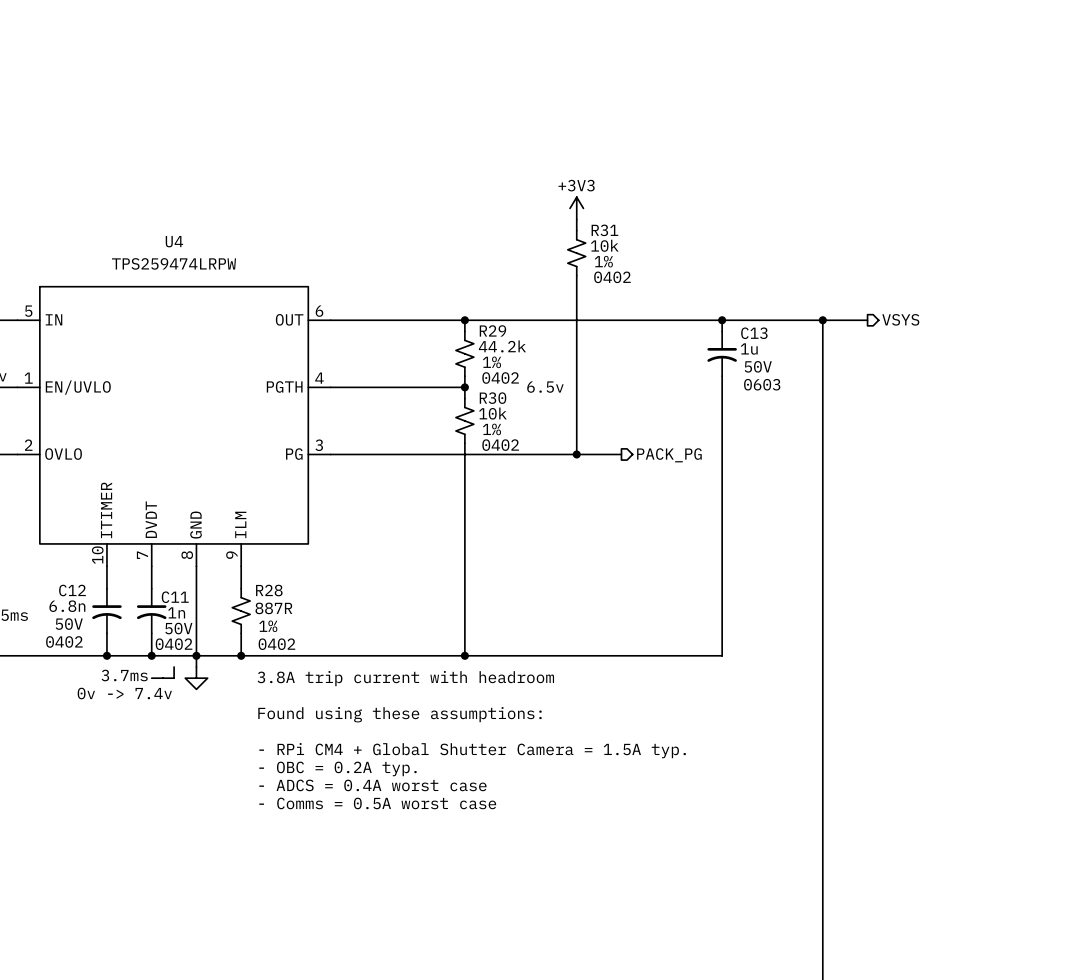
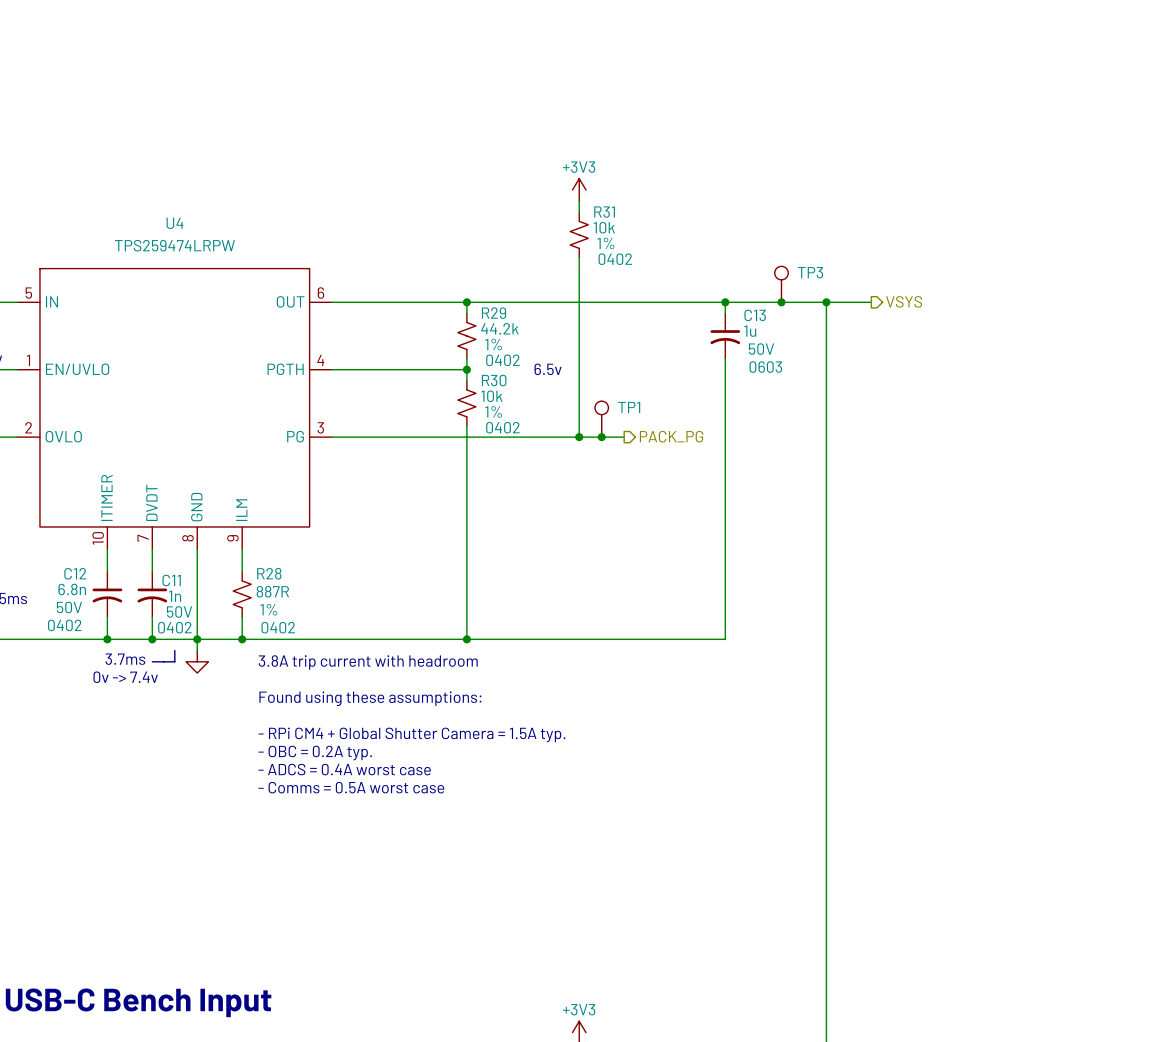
TP3: none -> (781, 284)
junction: none -> (781, 302)
TP1: none -> (601, 419)
junction: none -> (601, 437)

